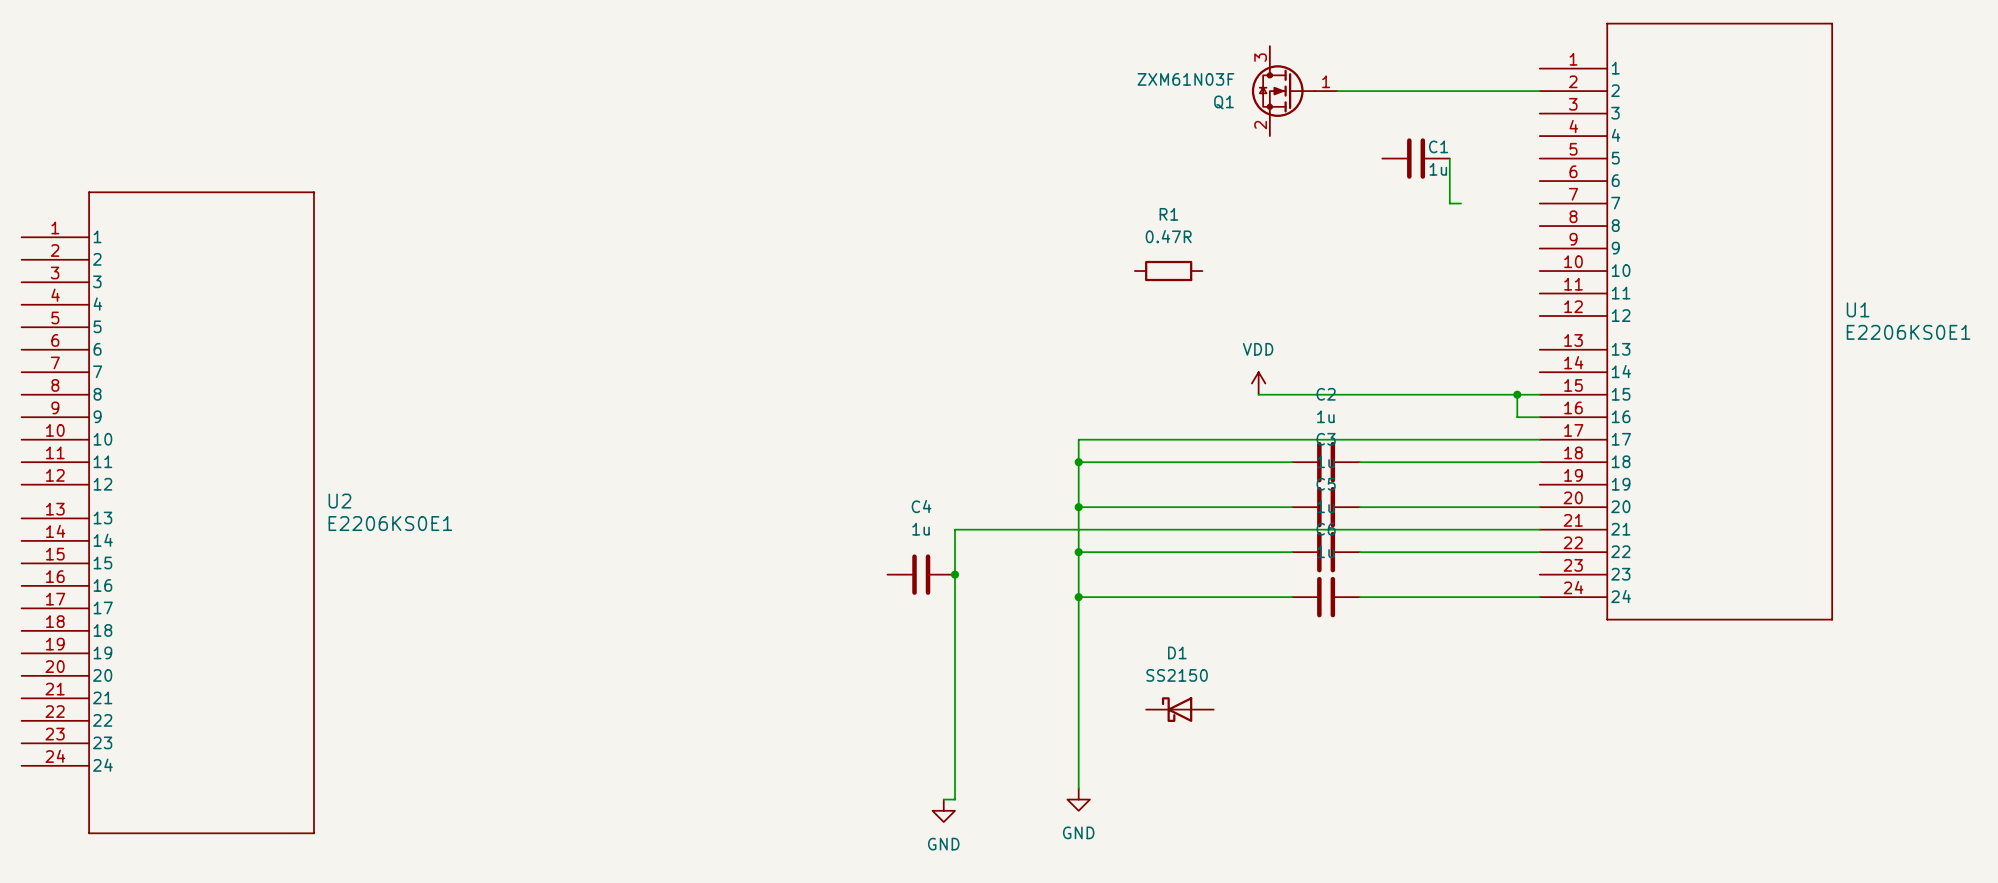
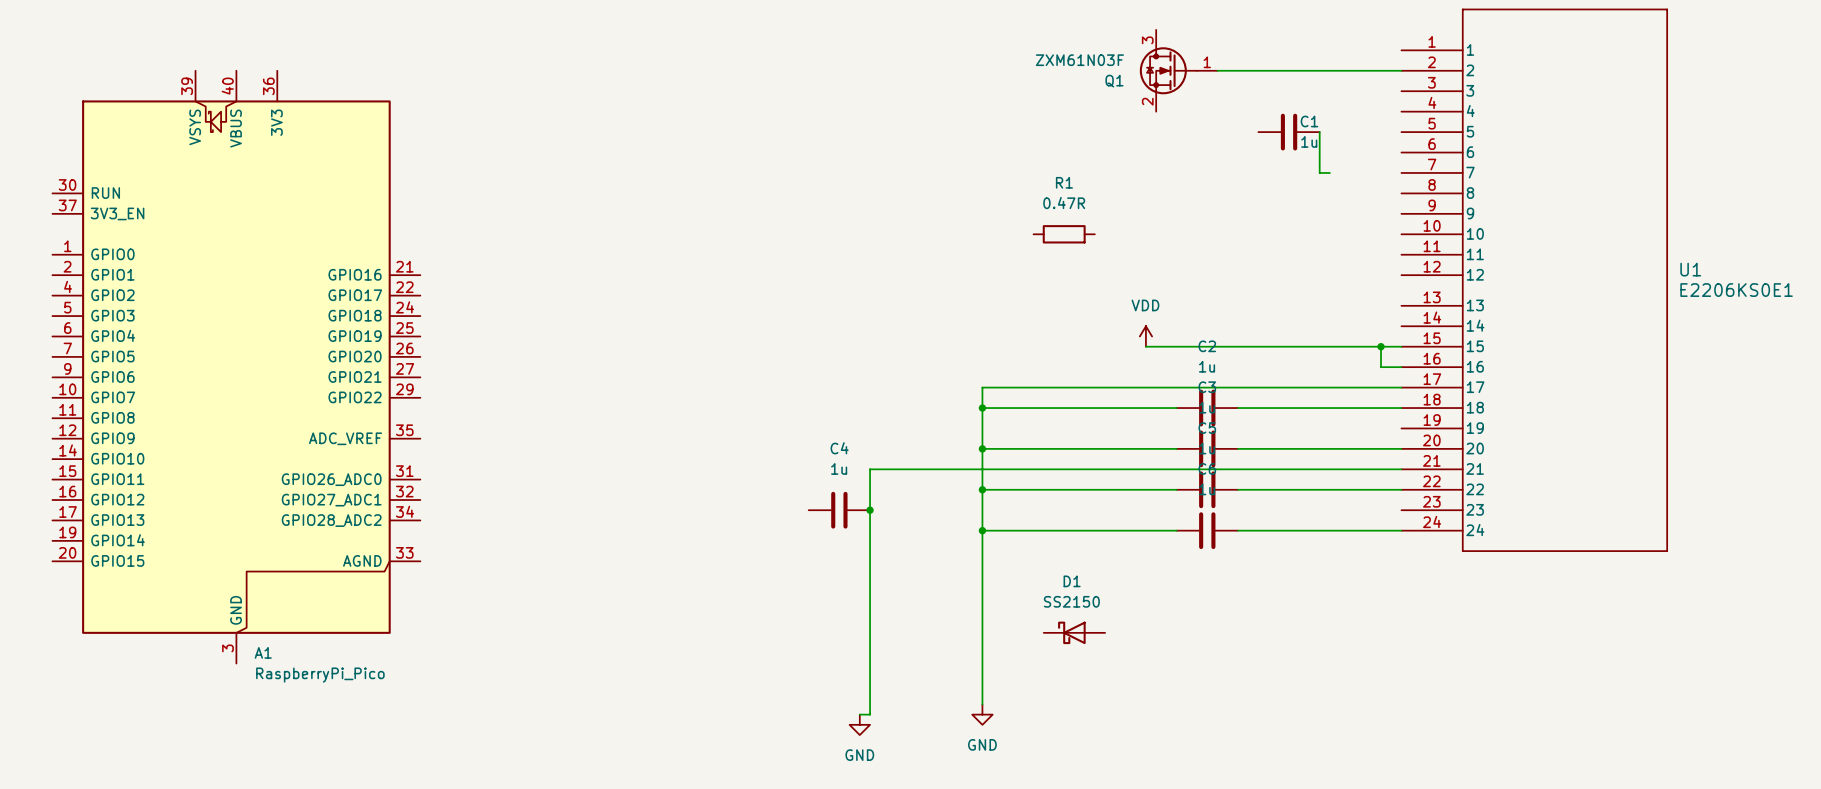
A1: none -> RaspberryPi_Pico (236, 367)
U2: E2206KS0E1 (168, 512) -> none

